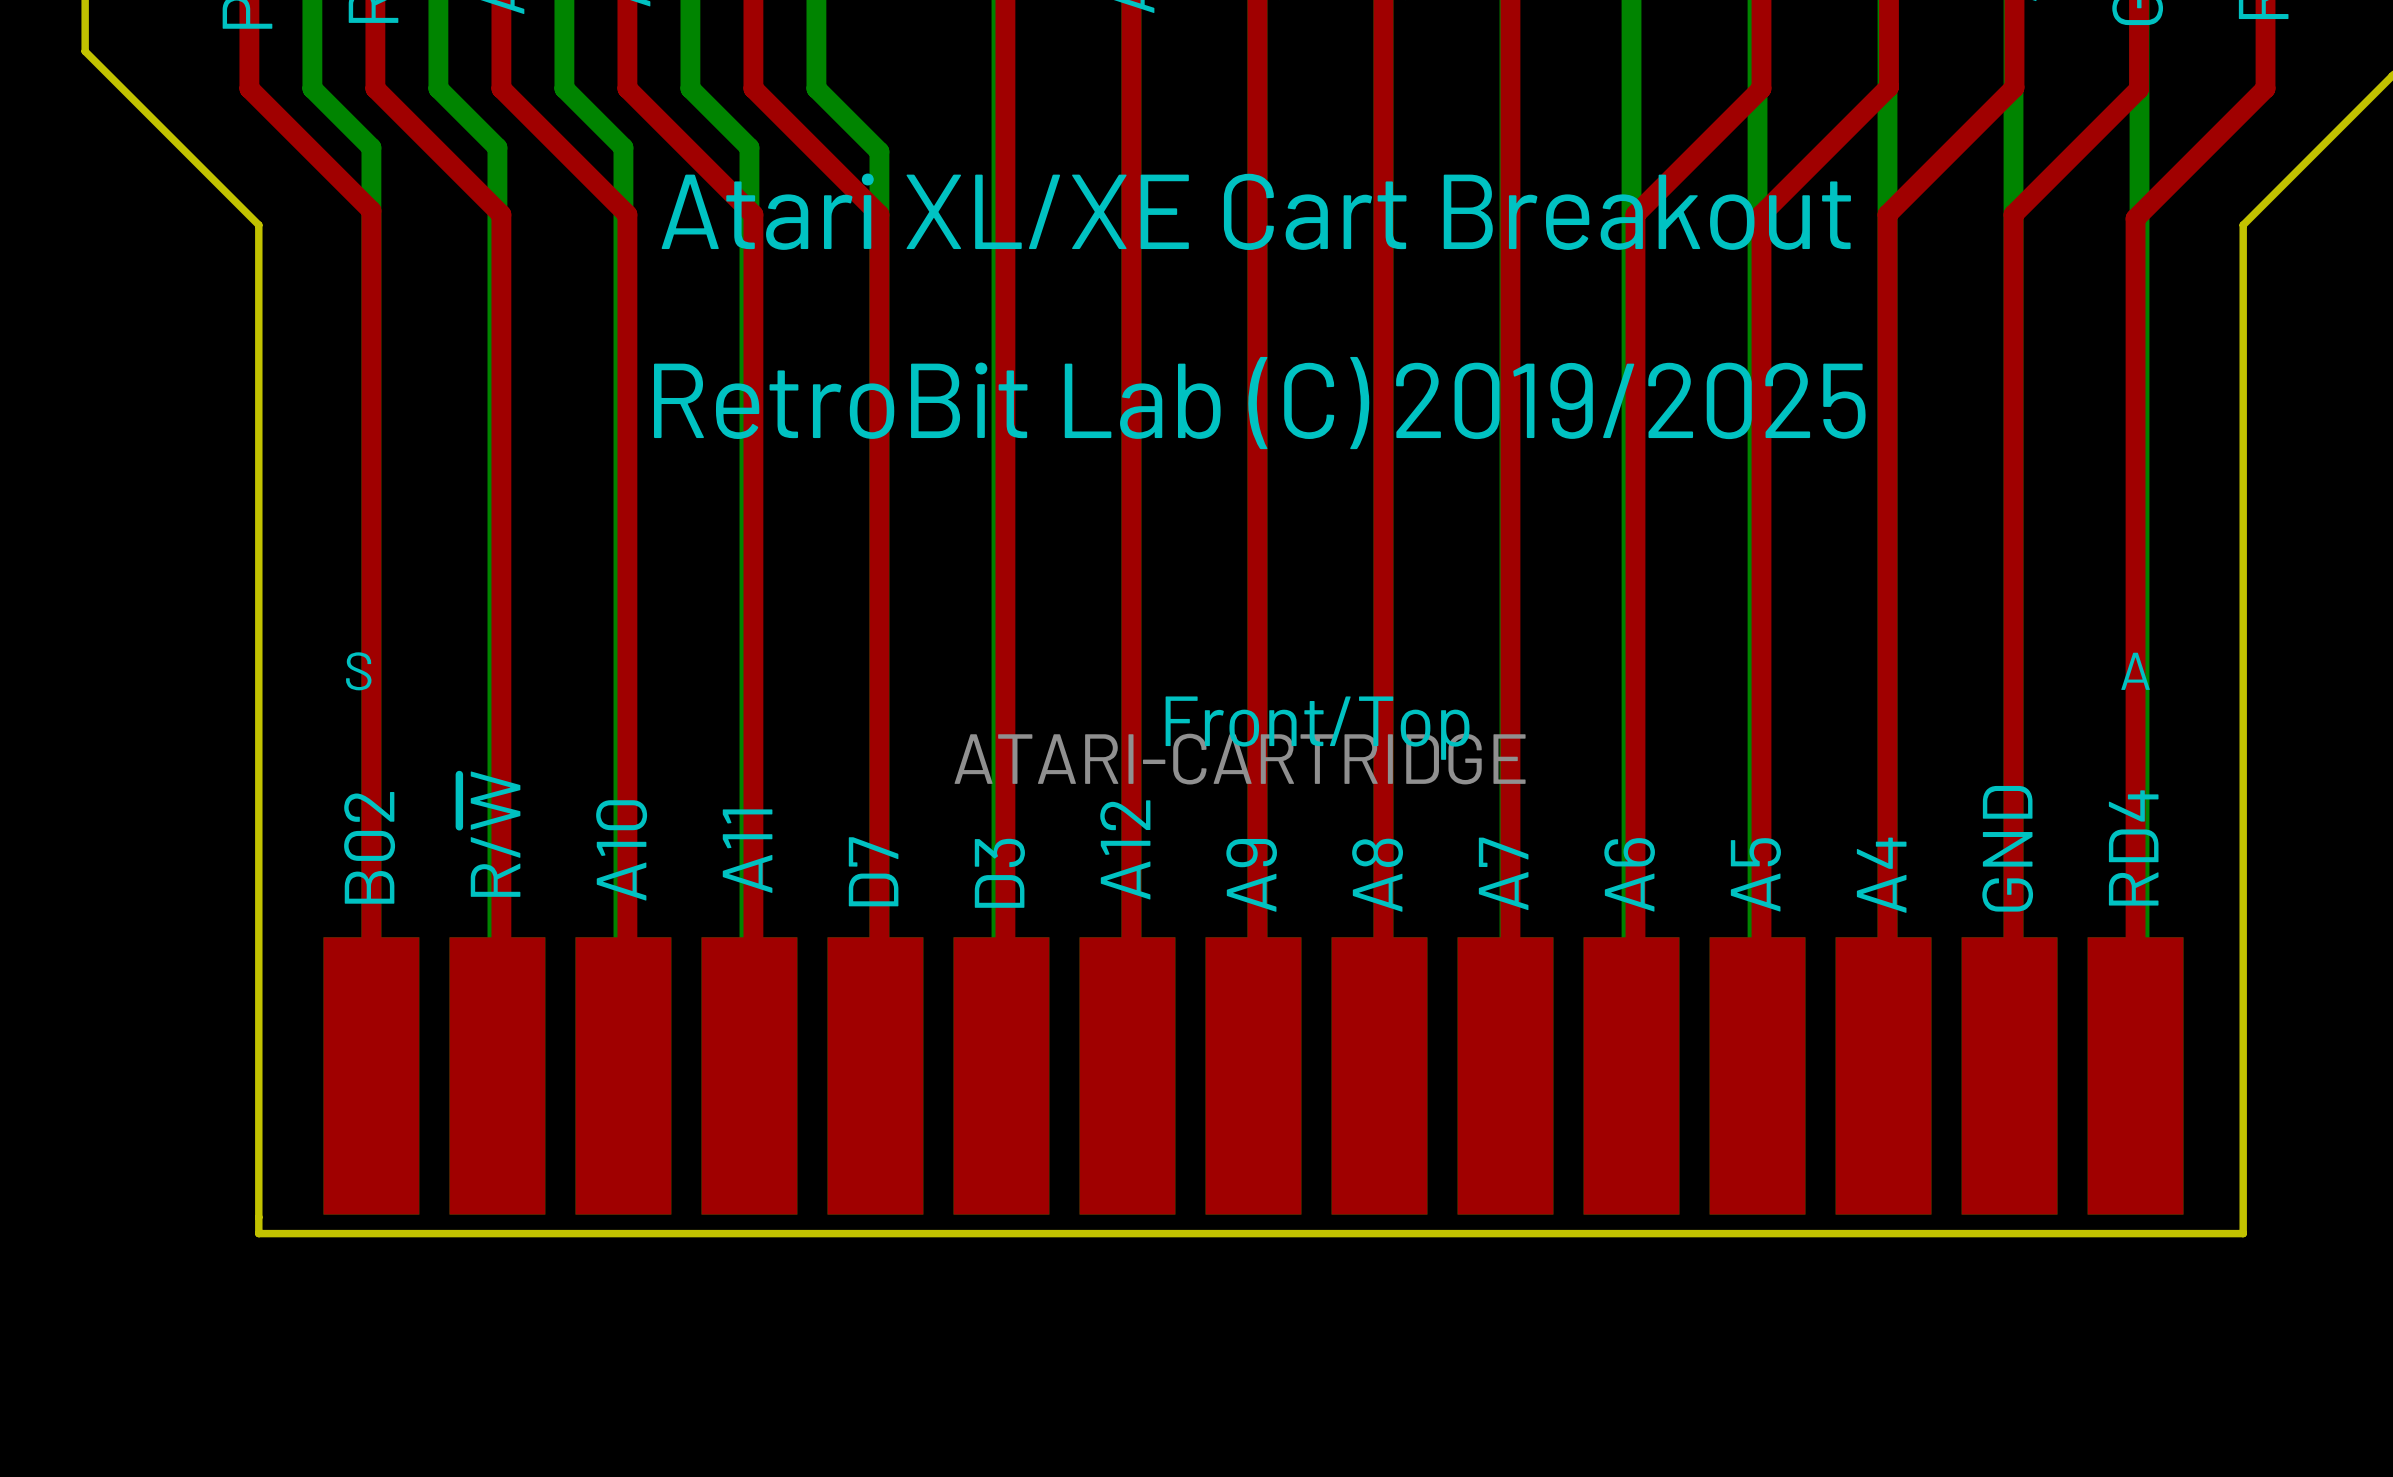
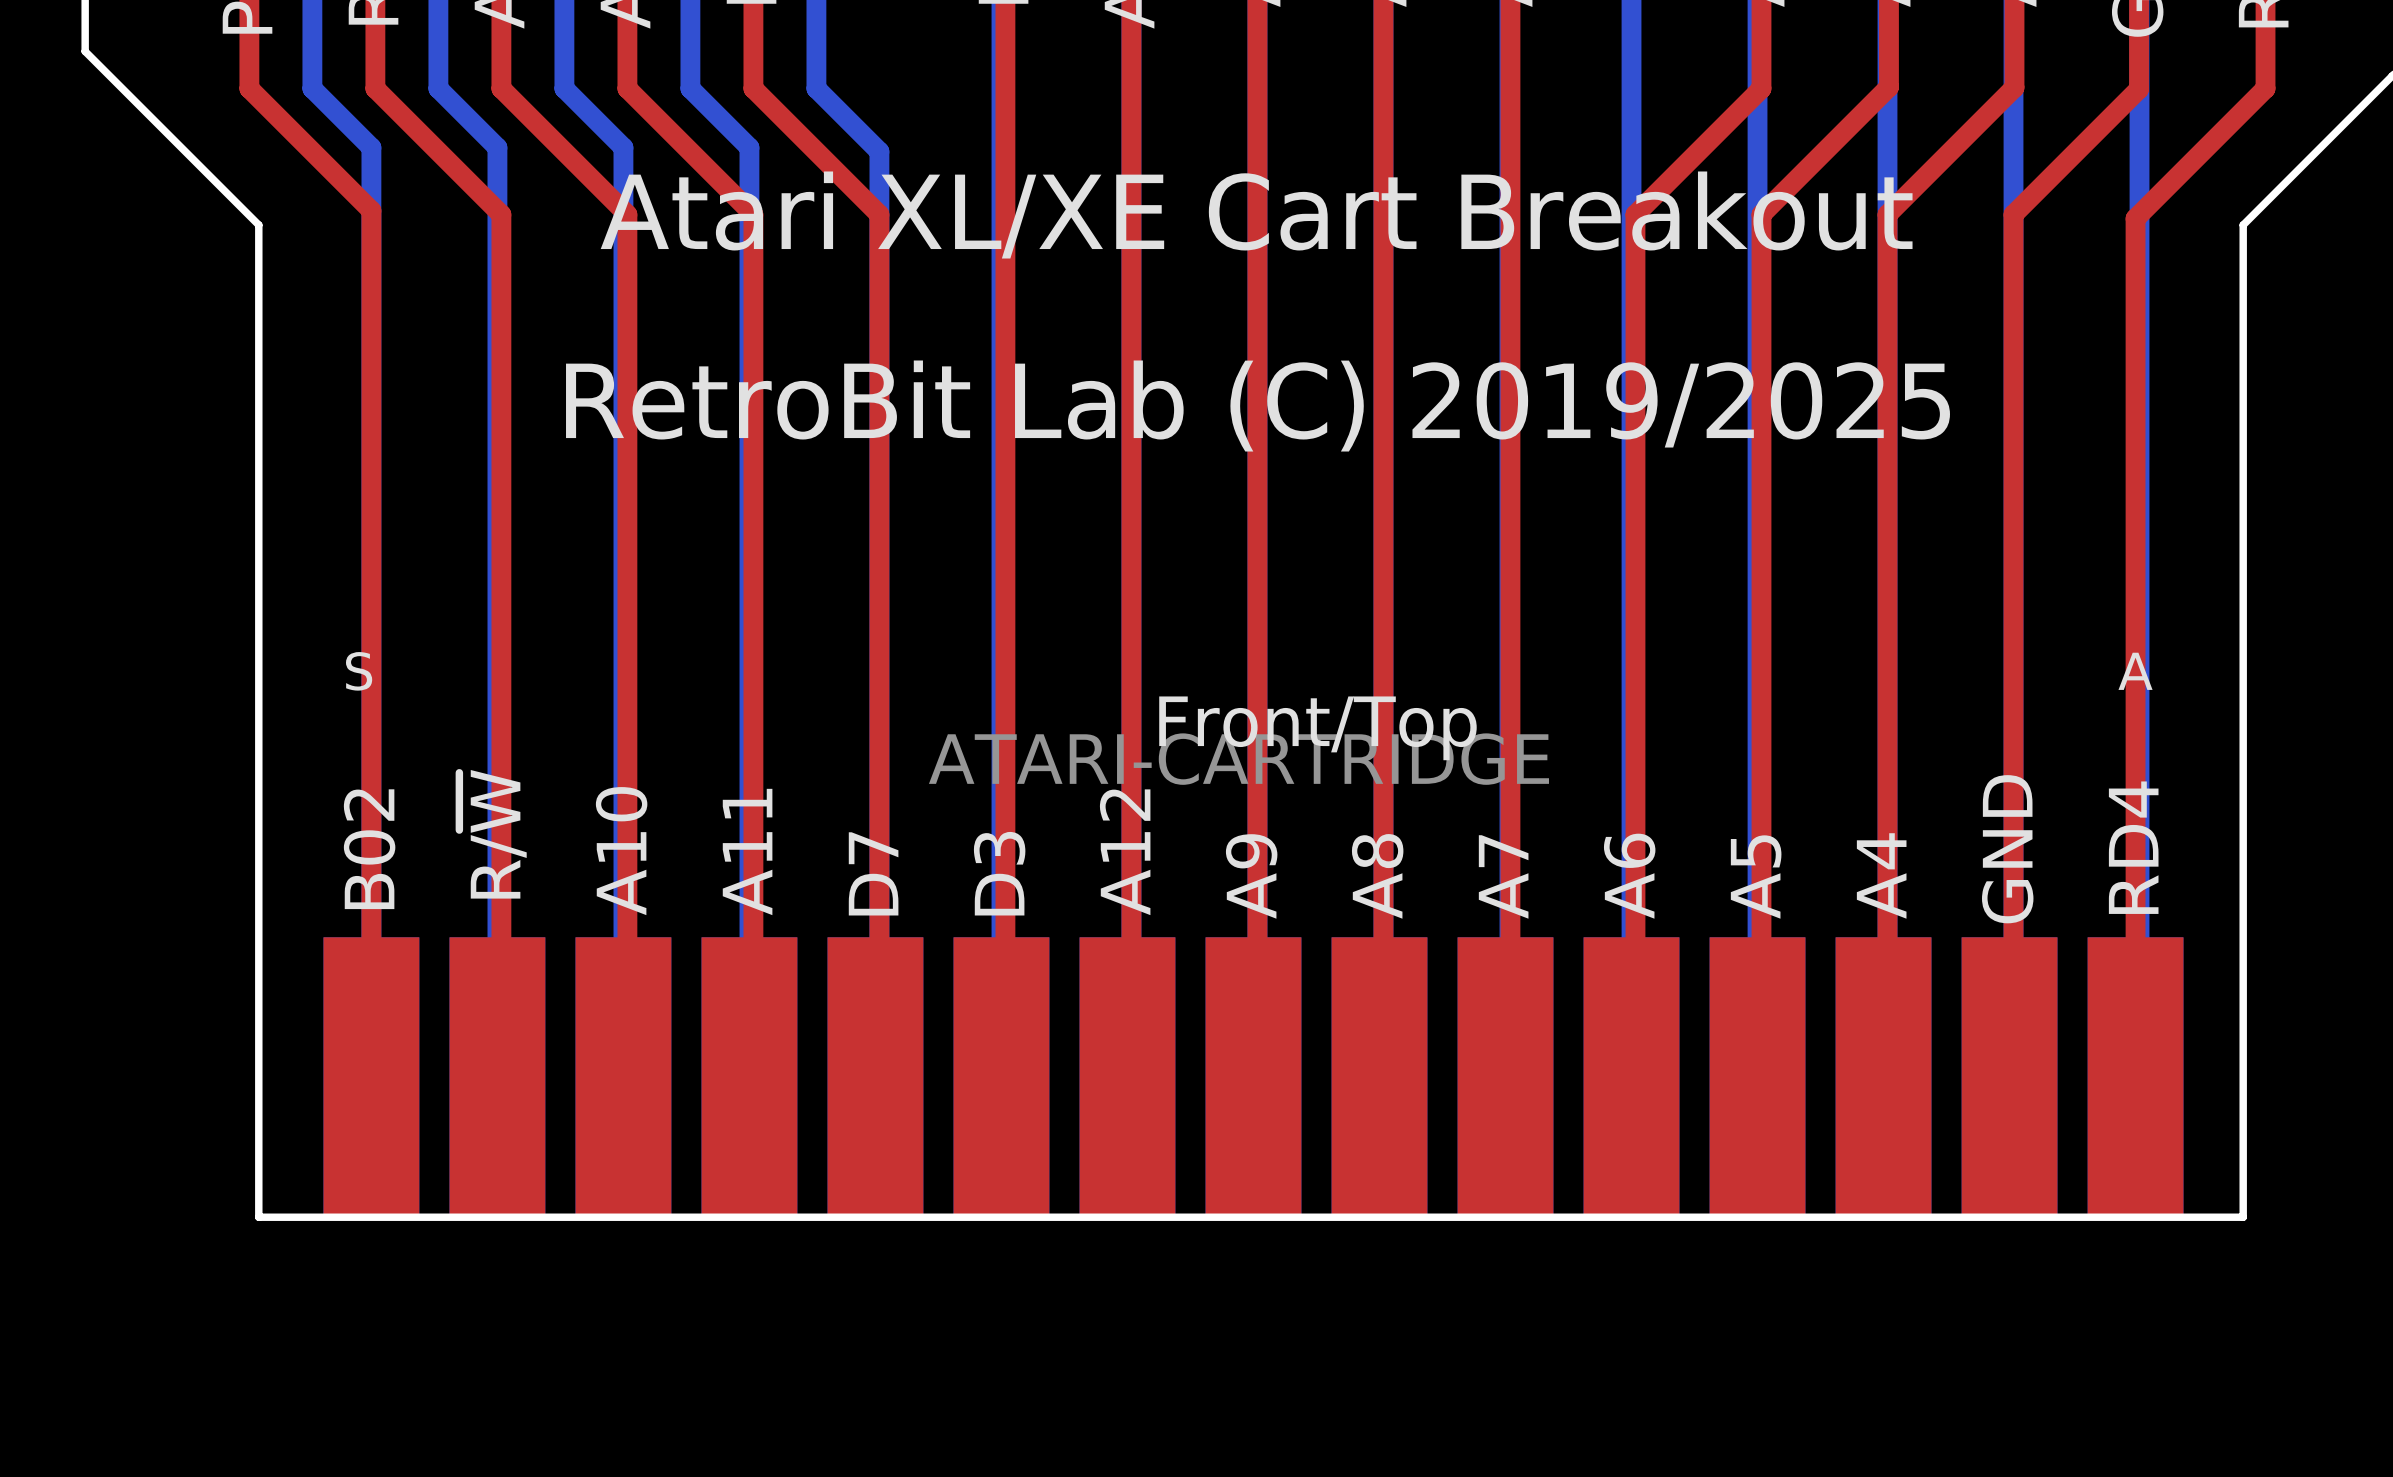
board edge: (258, 1217) (258, 1233) (2243, 1233) (2243, 1217) -> (258, 1217) (2243, 1217)

